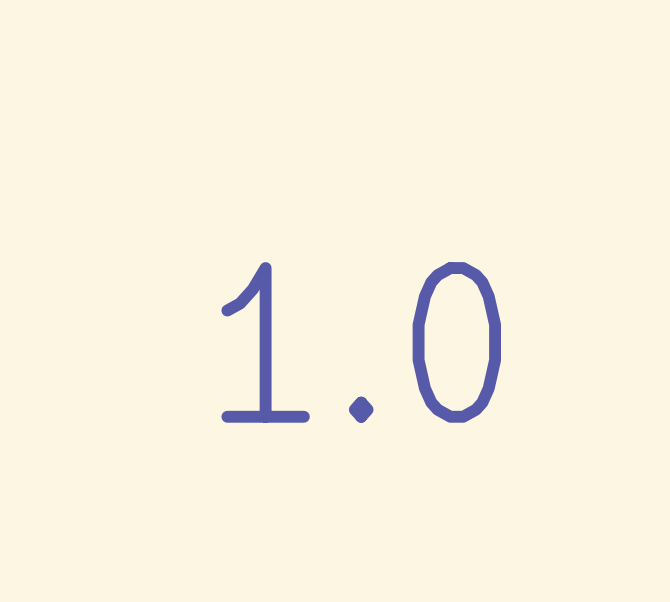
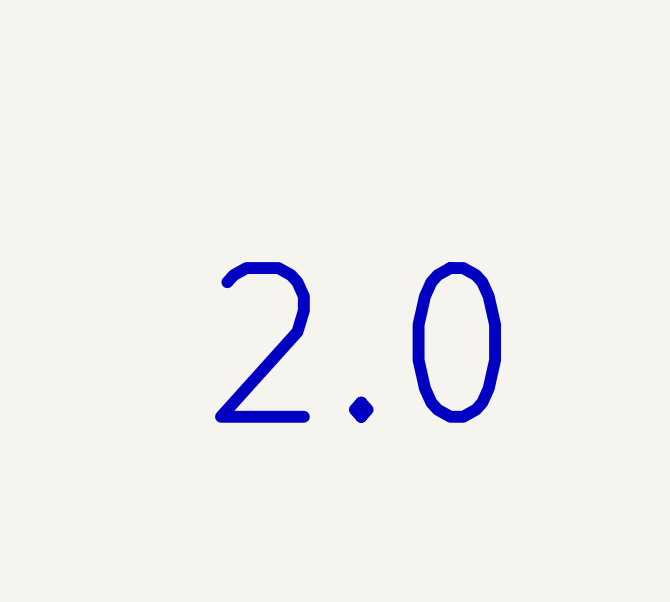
text: 1.0 (361, 342) -> 2.0 (358, 342)

